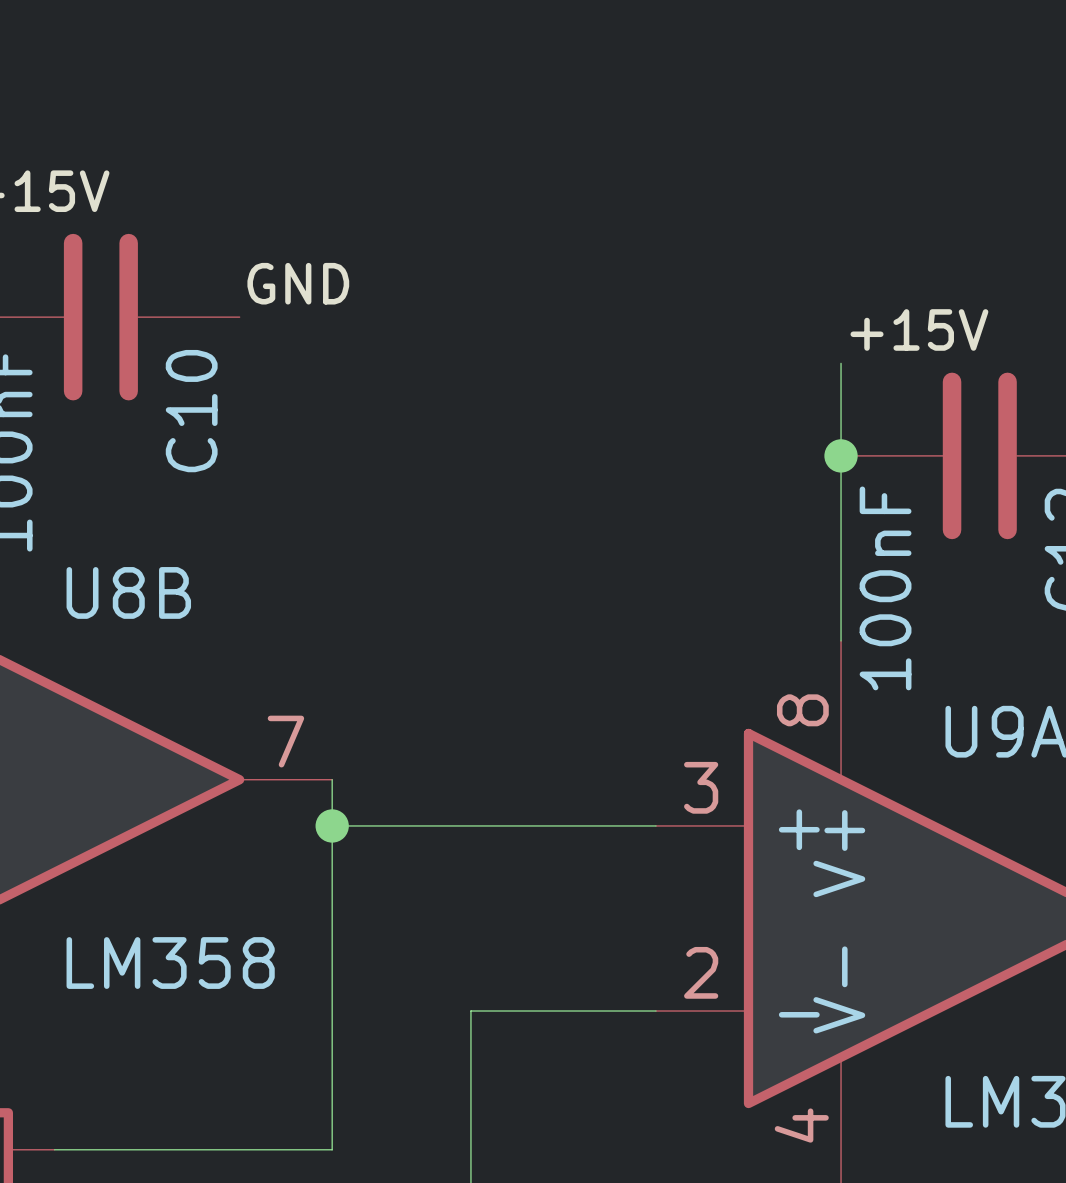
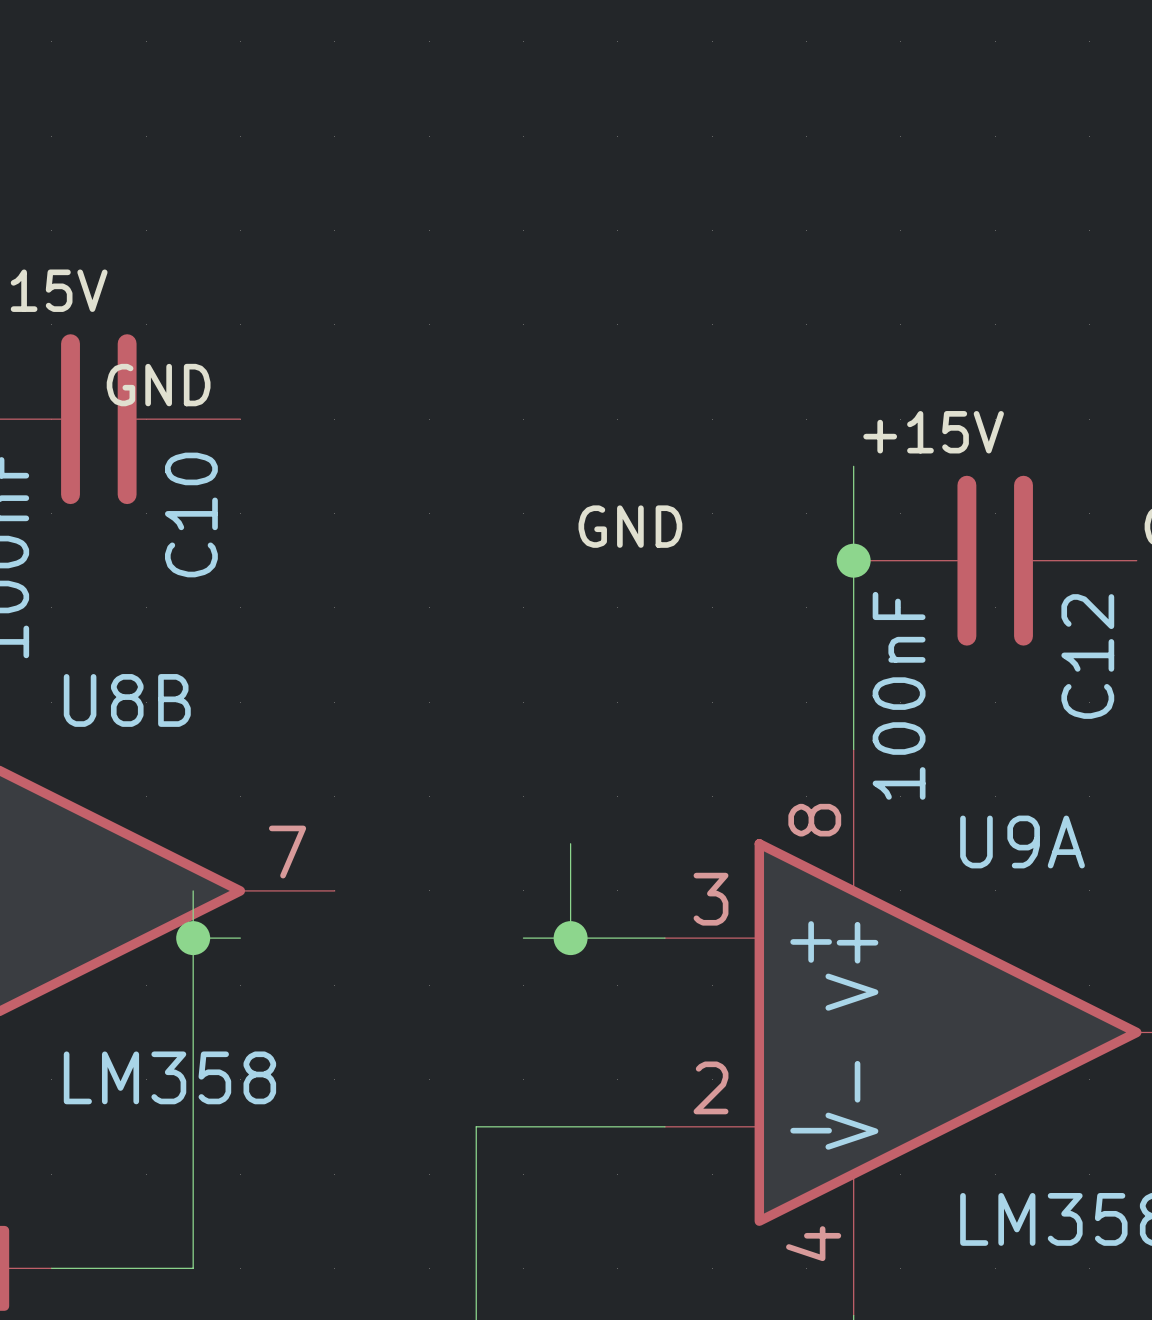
label position: GND (298, 283) -> GND (158, 385)
label: none -> GND (630, 526)
wire: none -> (570, 843) (570, 938)
wire: (332, 779) (332, 1149) (193, 1149) -> (193, 890) (193, 1268)
wire: none -> (193, 938) (240, 938)
junction: none -> (193, 938)
wire: (332, 825) (517, 825) -> none
junction: (332, 825) -> none
junction: none -> (570, 938)

